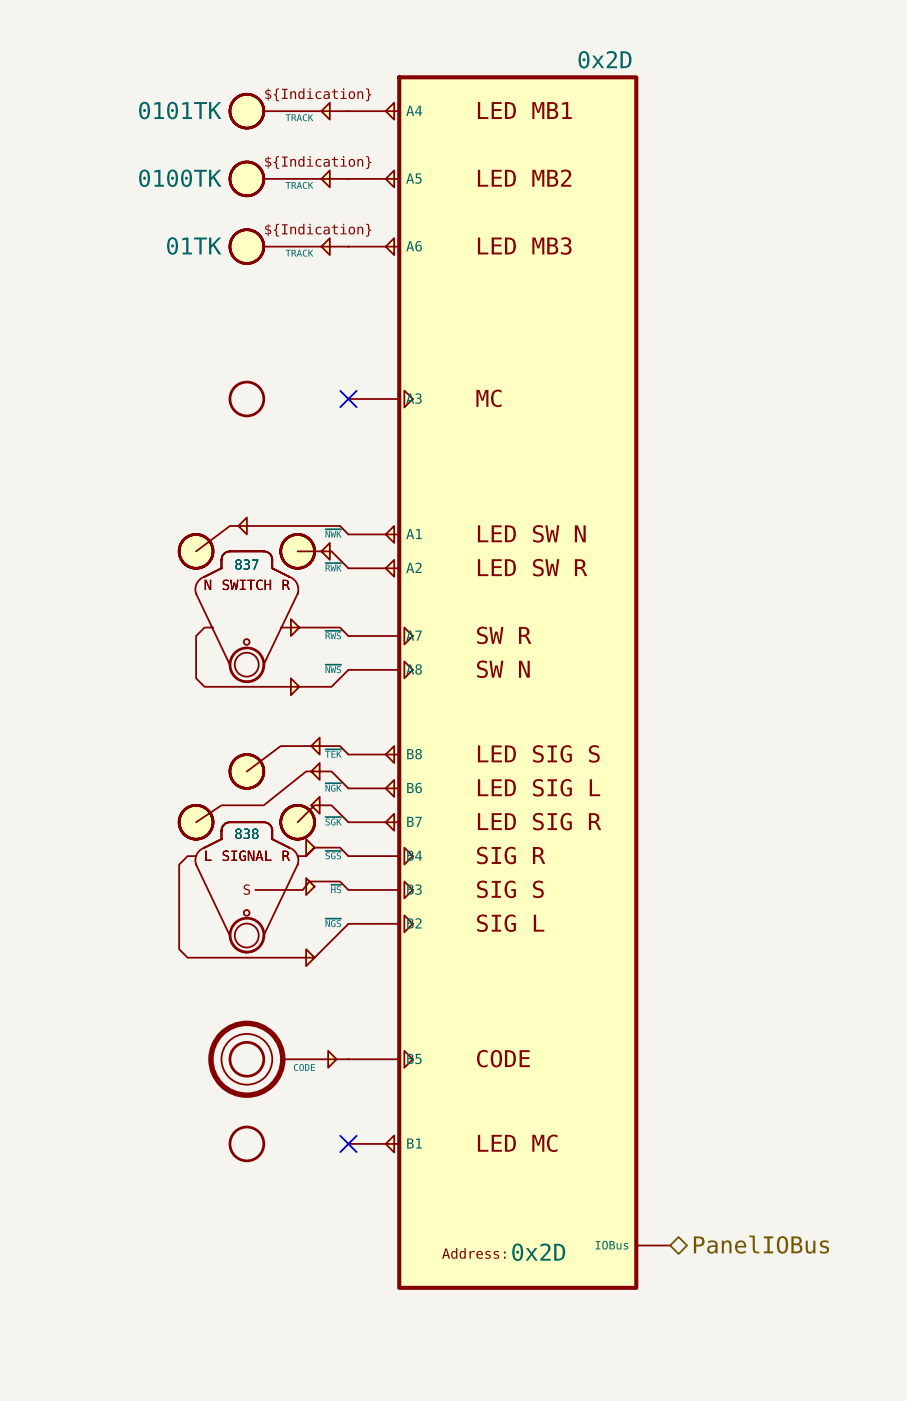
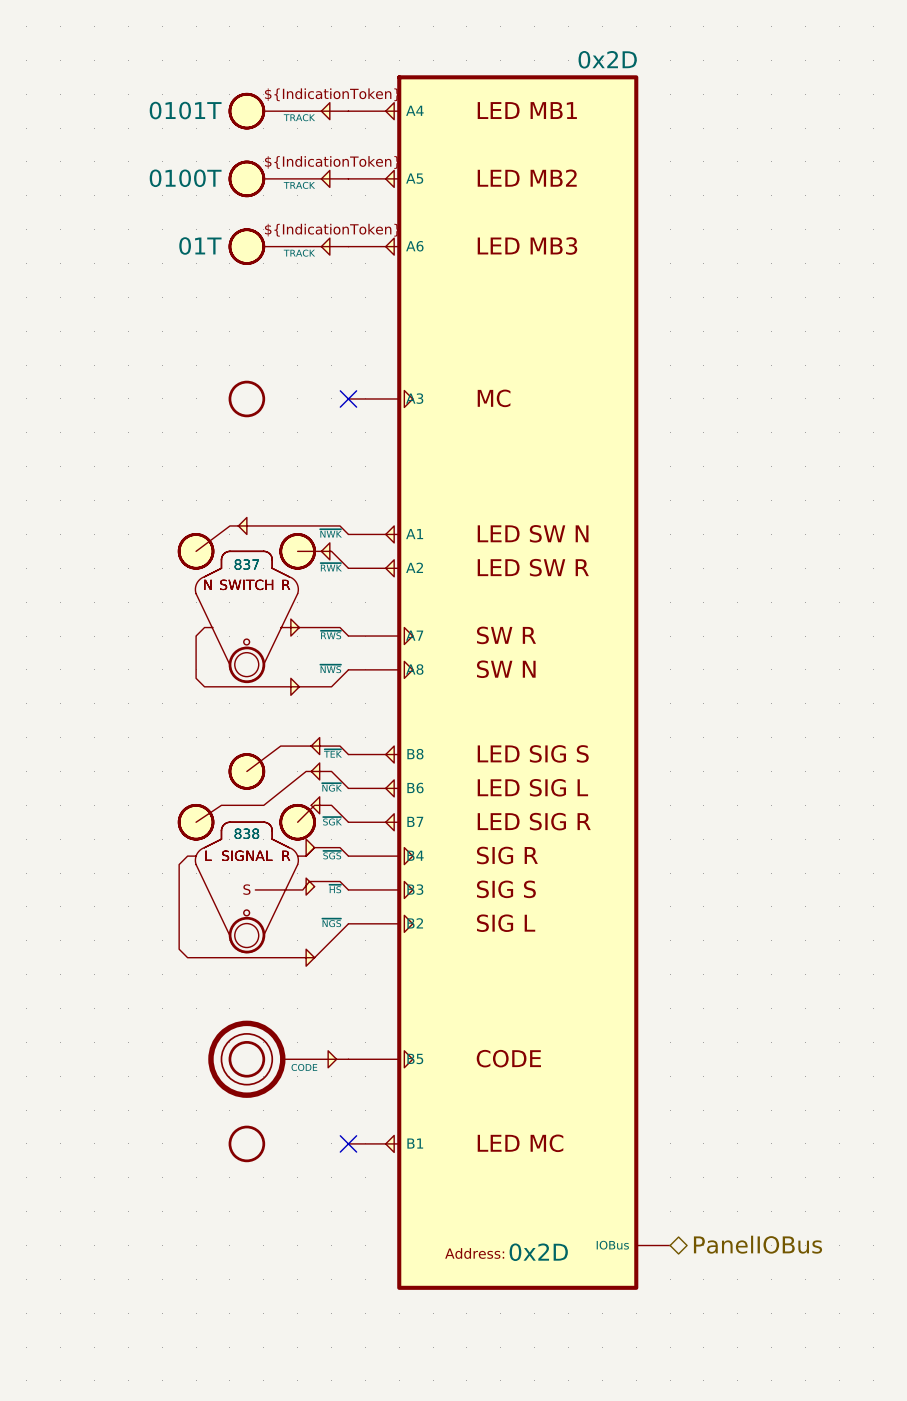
part text: ${Indication} (318, 94) -> ${IndicationToken} (332, 94)
part text: 0101TK (180, 110) -> none
part text: none -> 0101T (185, 110)
part text: ${Indication} (318, 162) -> ${IndicationToken} (332, 162)
part text: 0100TK (180, 178) -> none
part text: none -> 0100T (185, 178)
part text: ${Indication} (318, 230) -> ${IndicationToken} (332, 230)
part text: 01TK (194, 246) -> none
part text: none -> 01T (200, 246)

